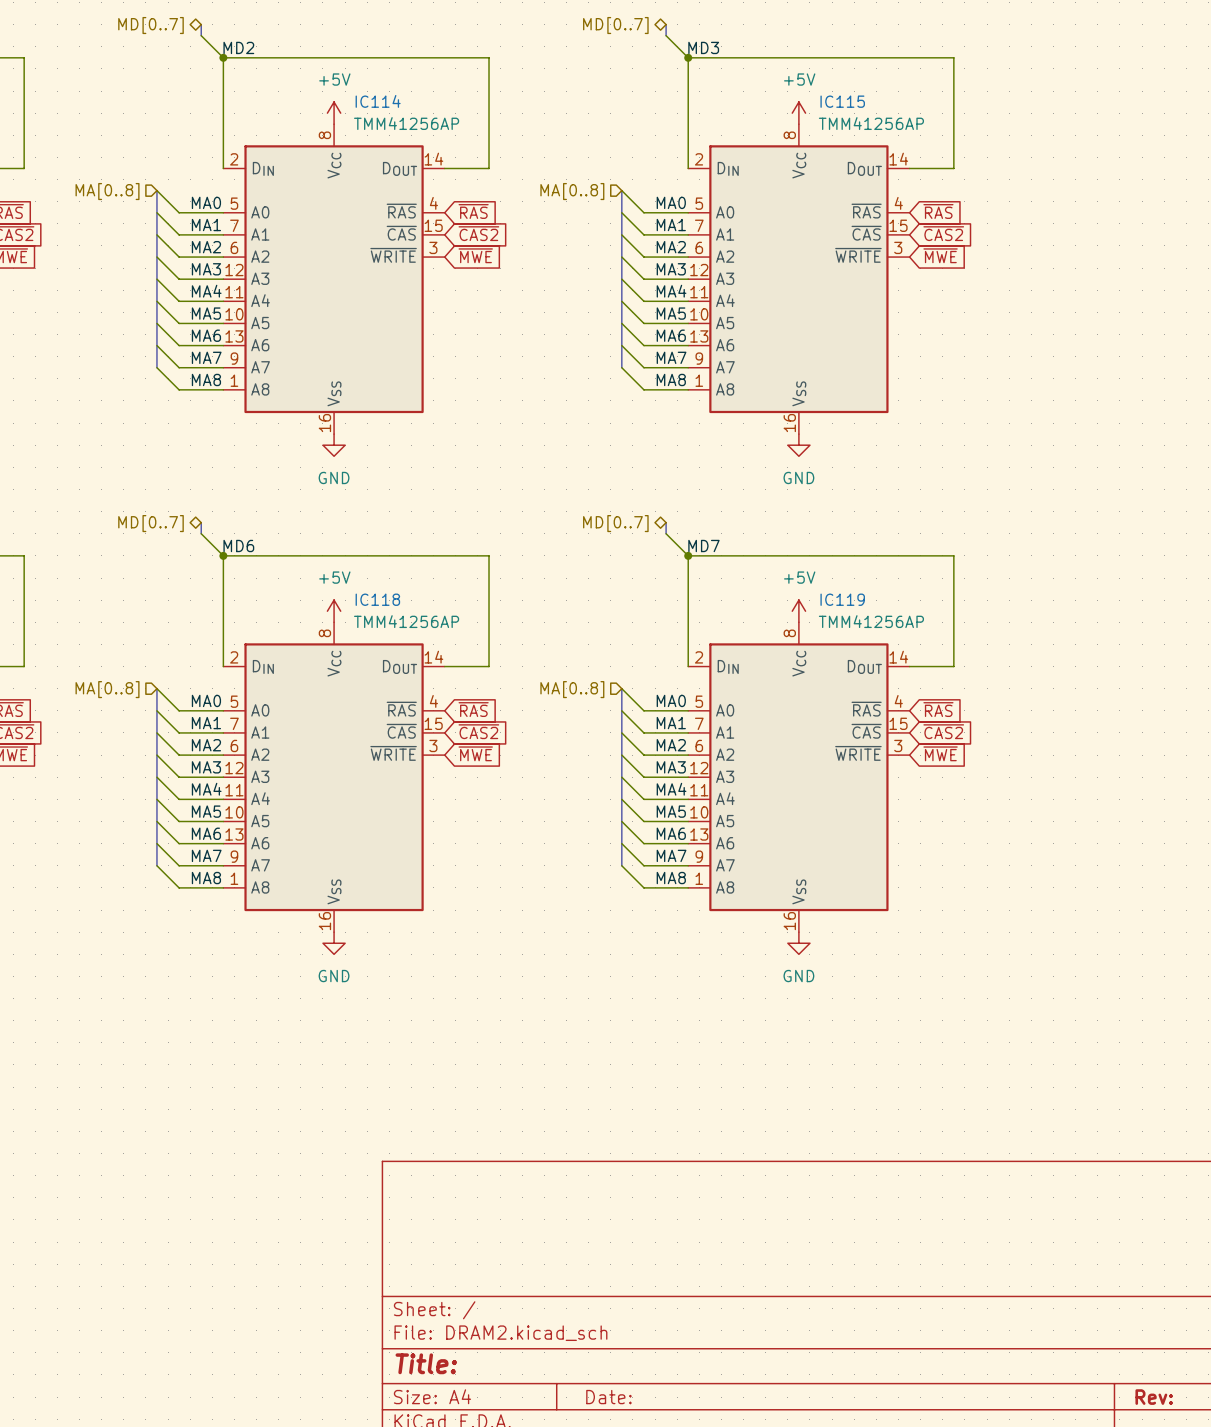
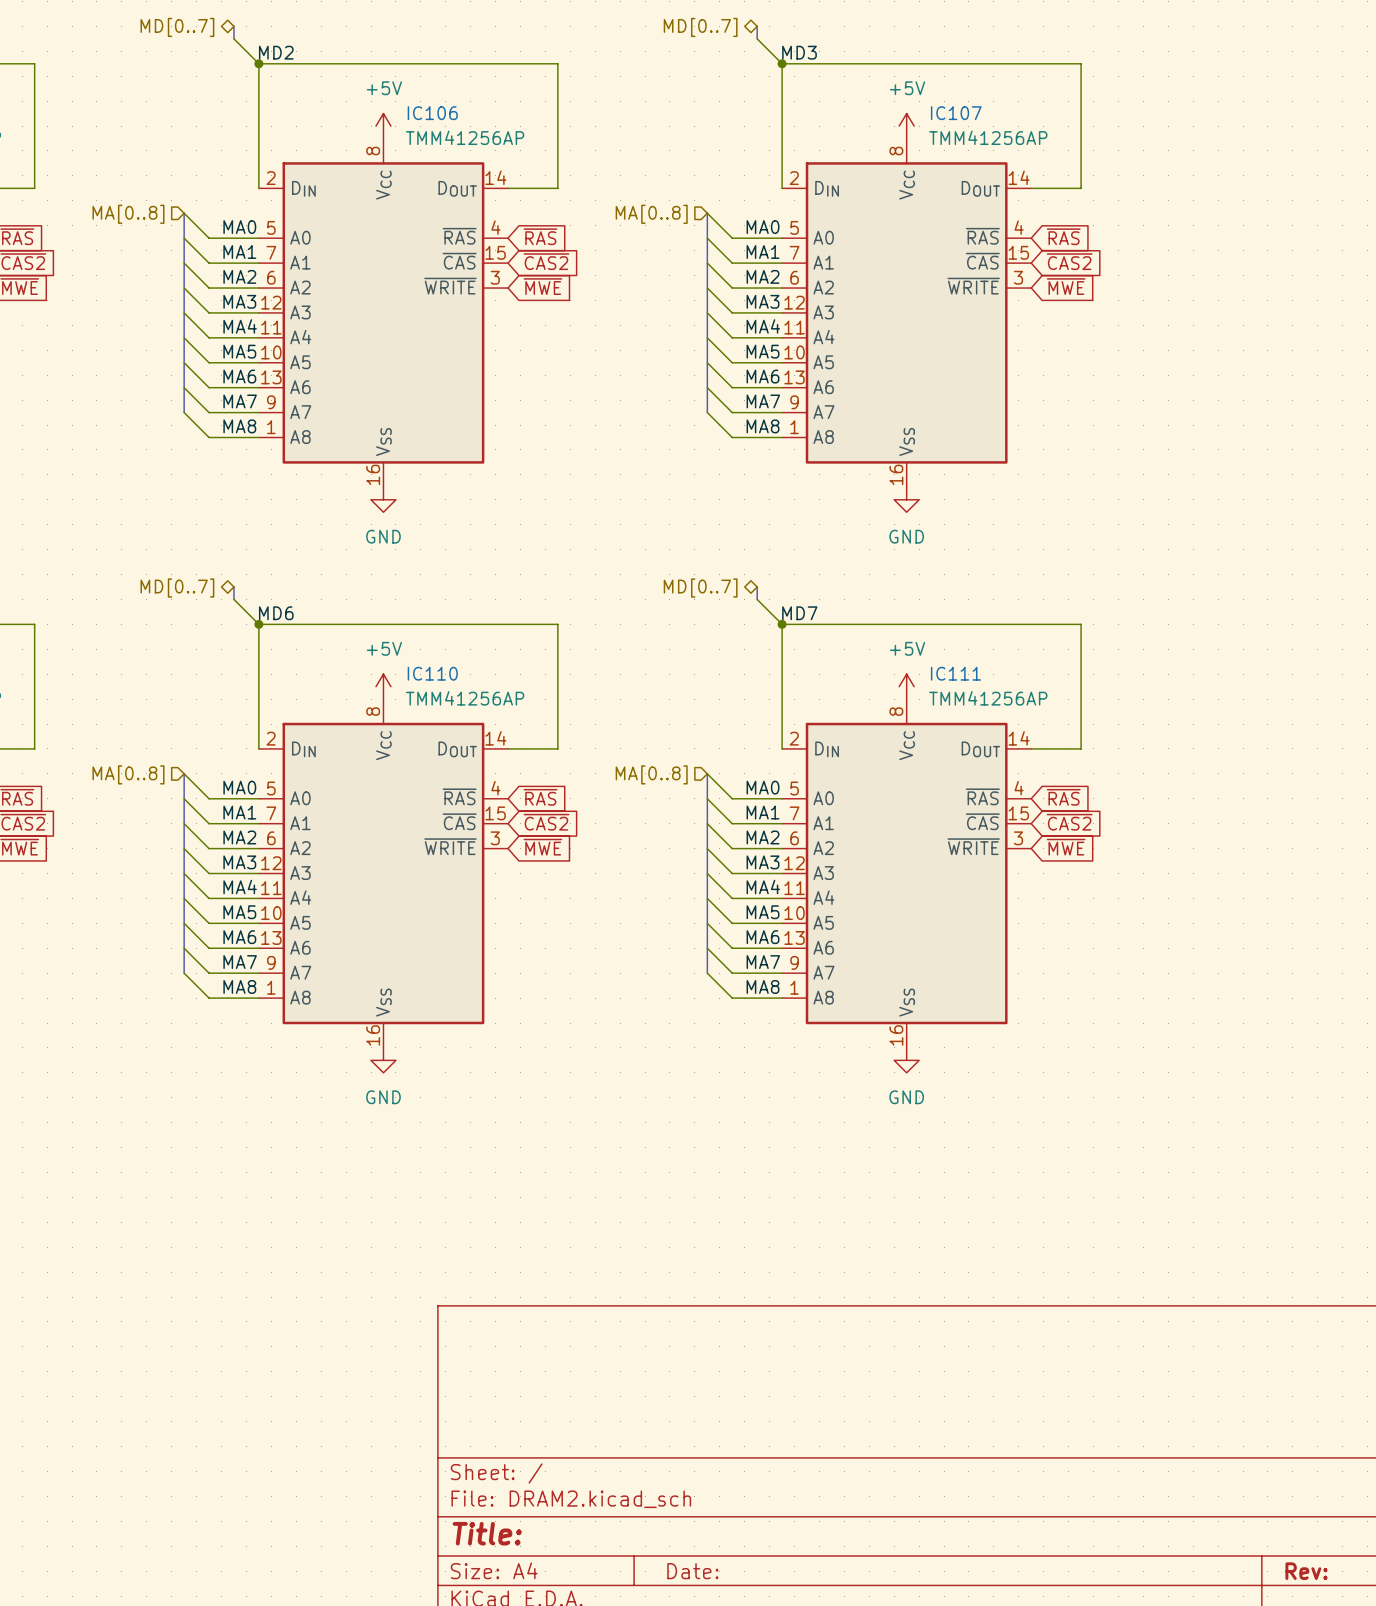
IC114 name: IC114 (378, 101) -> IC106 (432, 113)
IC115 name: IC115 (842, 101) -> IC107 (956, 113)
IC118 name: IC118 (377, 599) -> IC110 (432, 673)
IC119 name: IC119 (842, 599) -> IC111 (955, 673)

